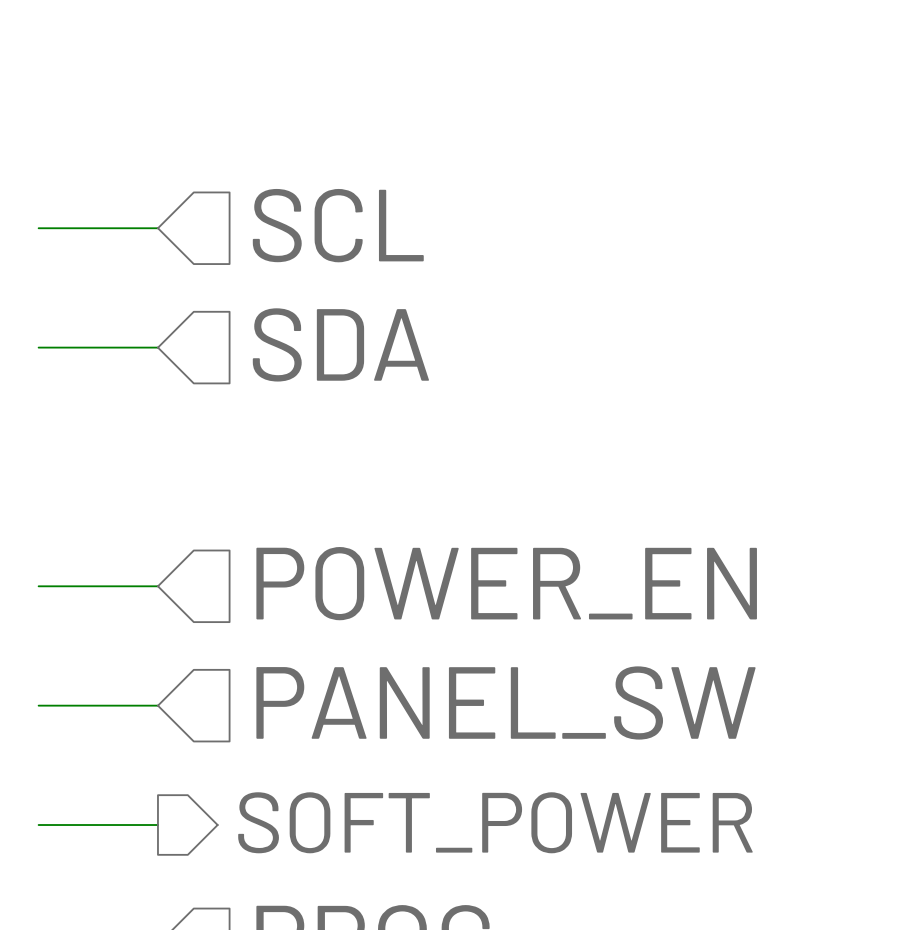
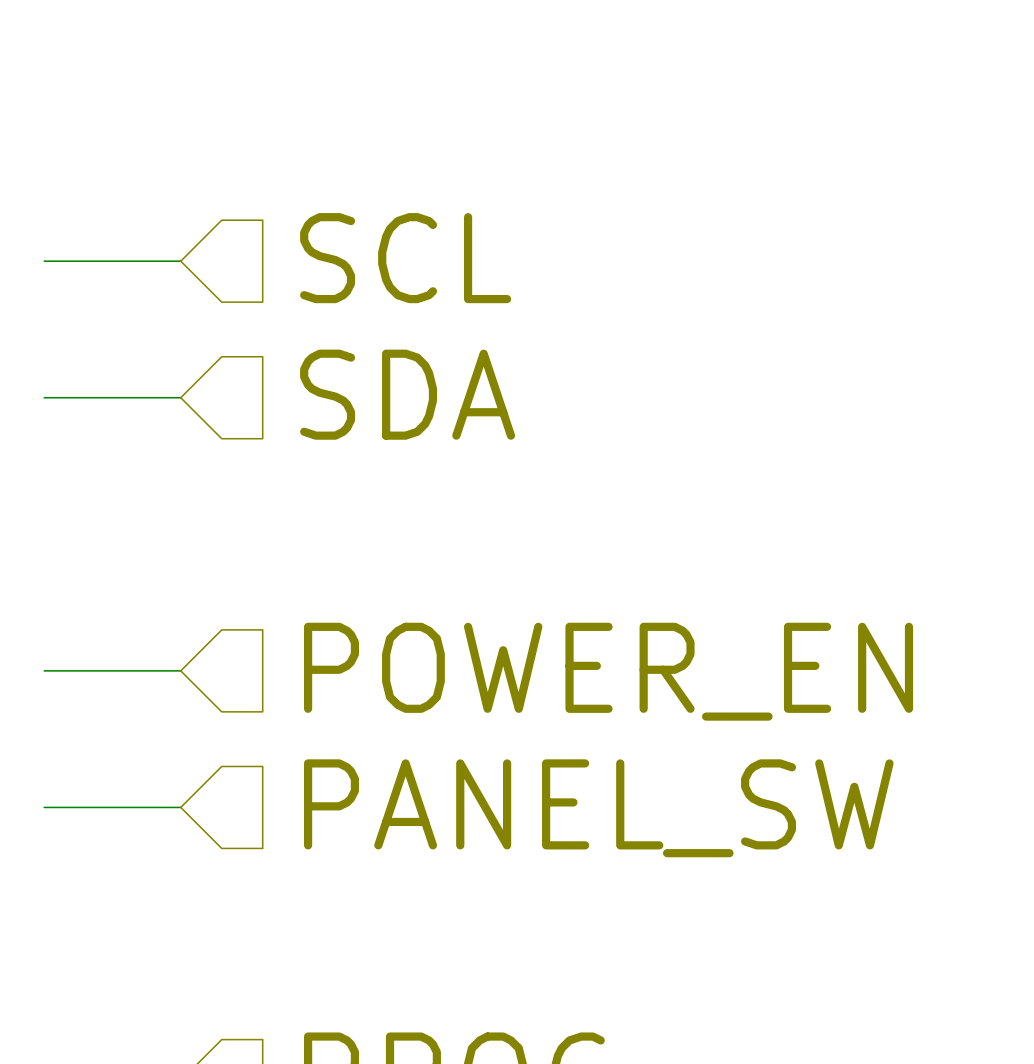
hierarchical label: SOFT_POWER (495, 822) -> none
wire: (38, 825) (157, 825) -> none

